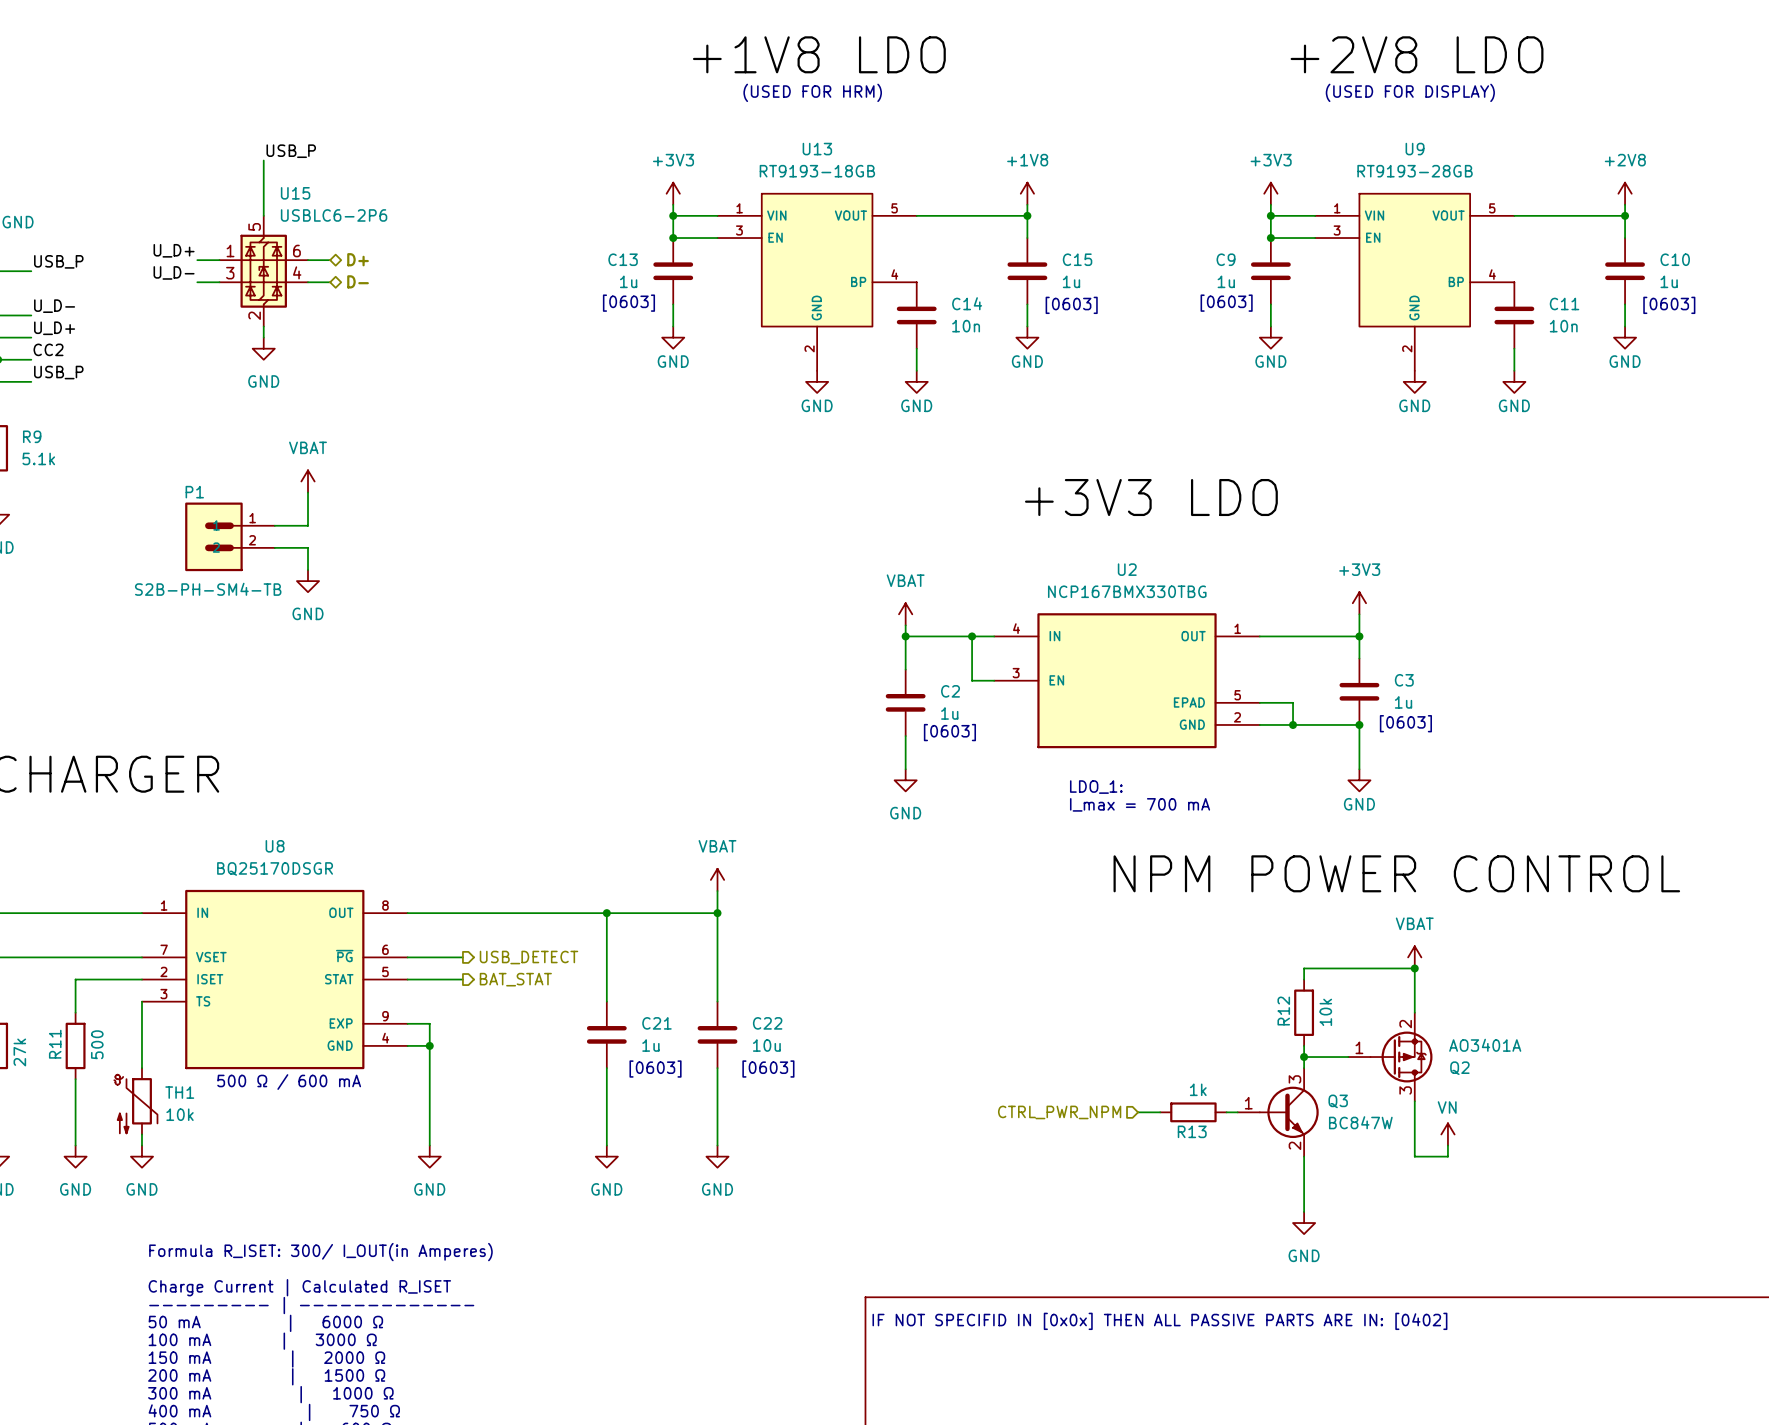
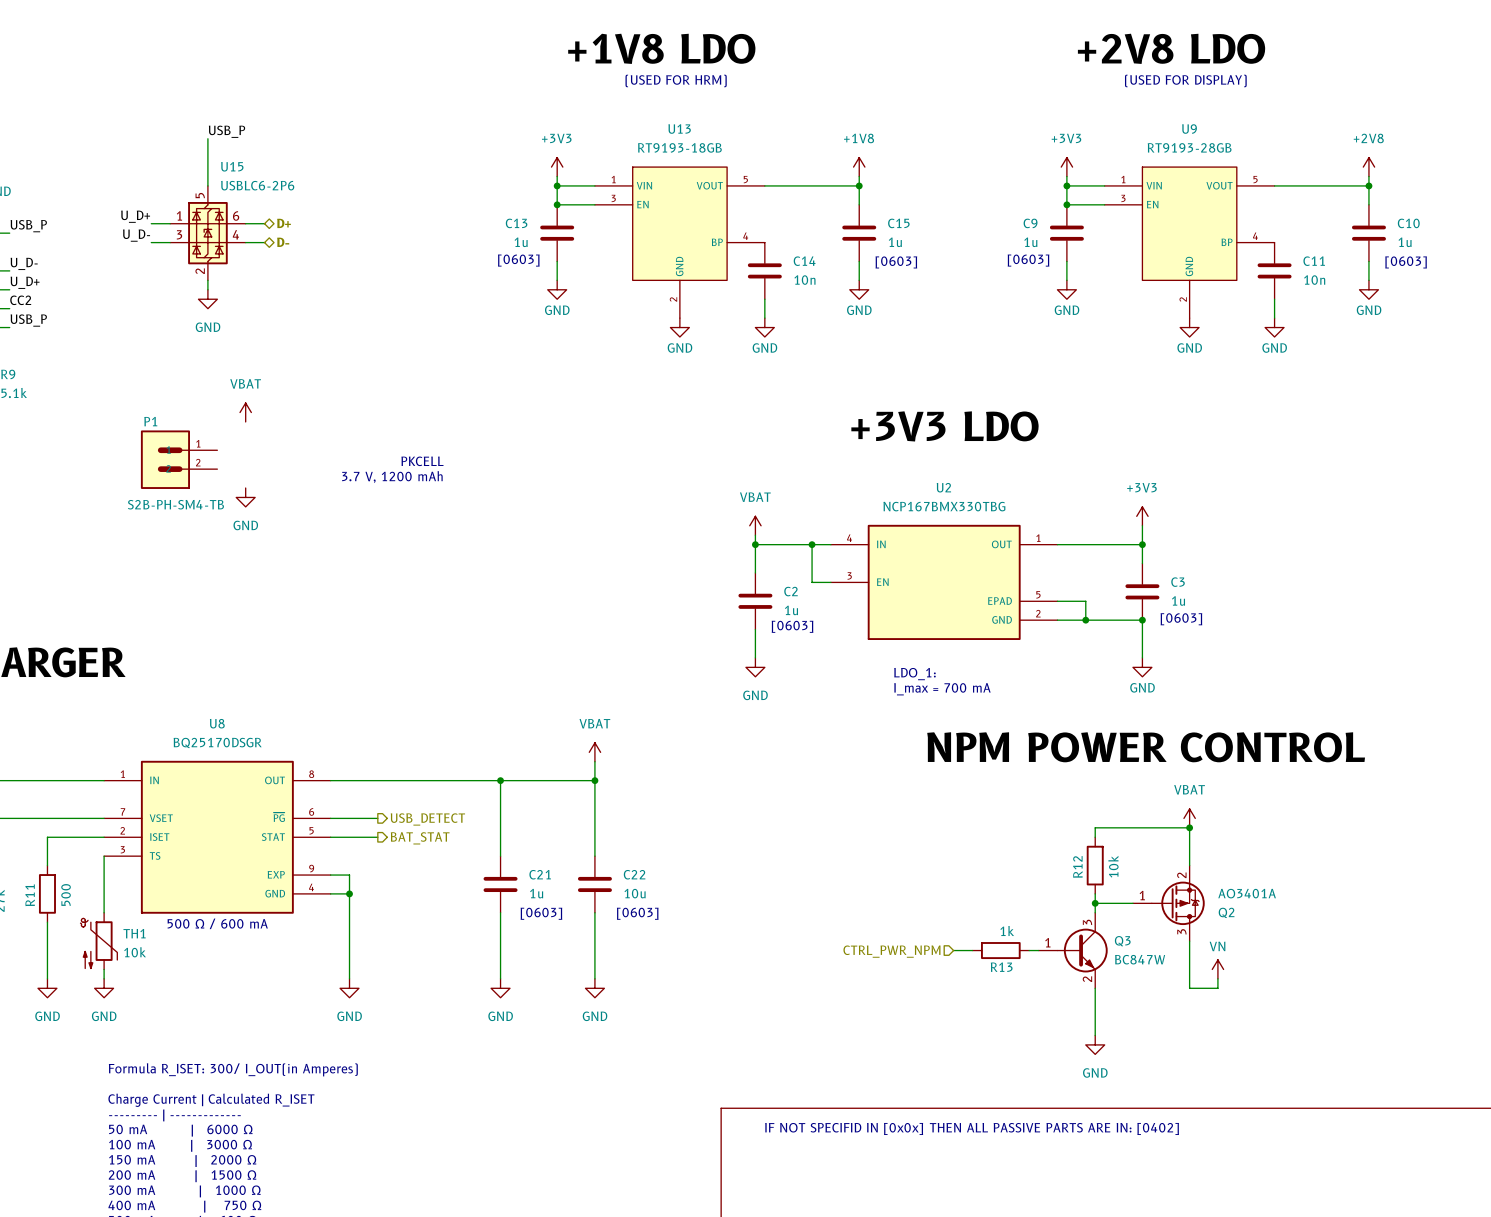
wire: (308, 492) (308, 525) (274, 525) -> none
text: none -> PKCELL (422, 461)
wire: (274, 547) (308, 547) (308, 570) -> none
text: none -> 3.7 V, 1200 mAh (392, 477)

